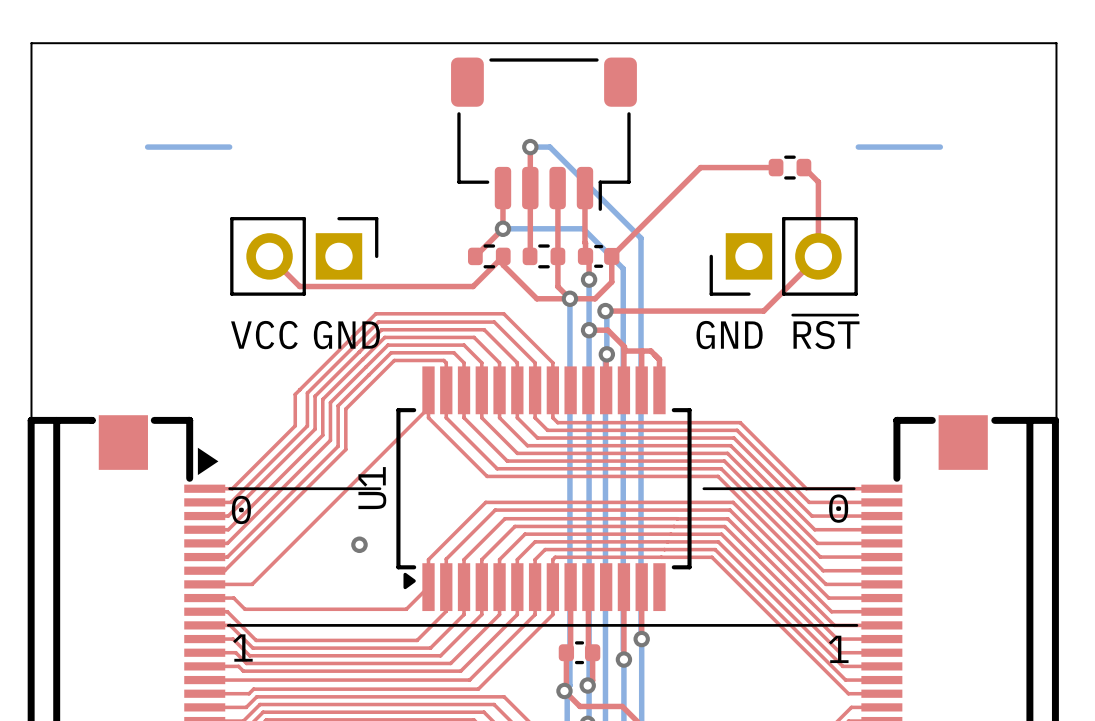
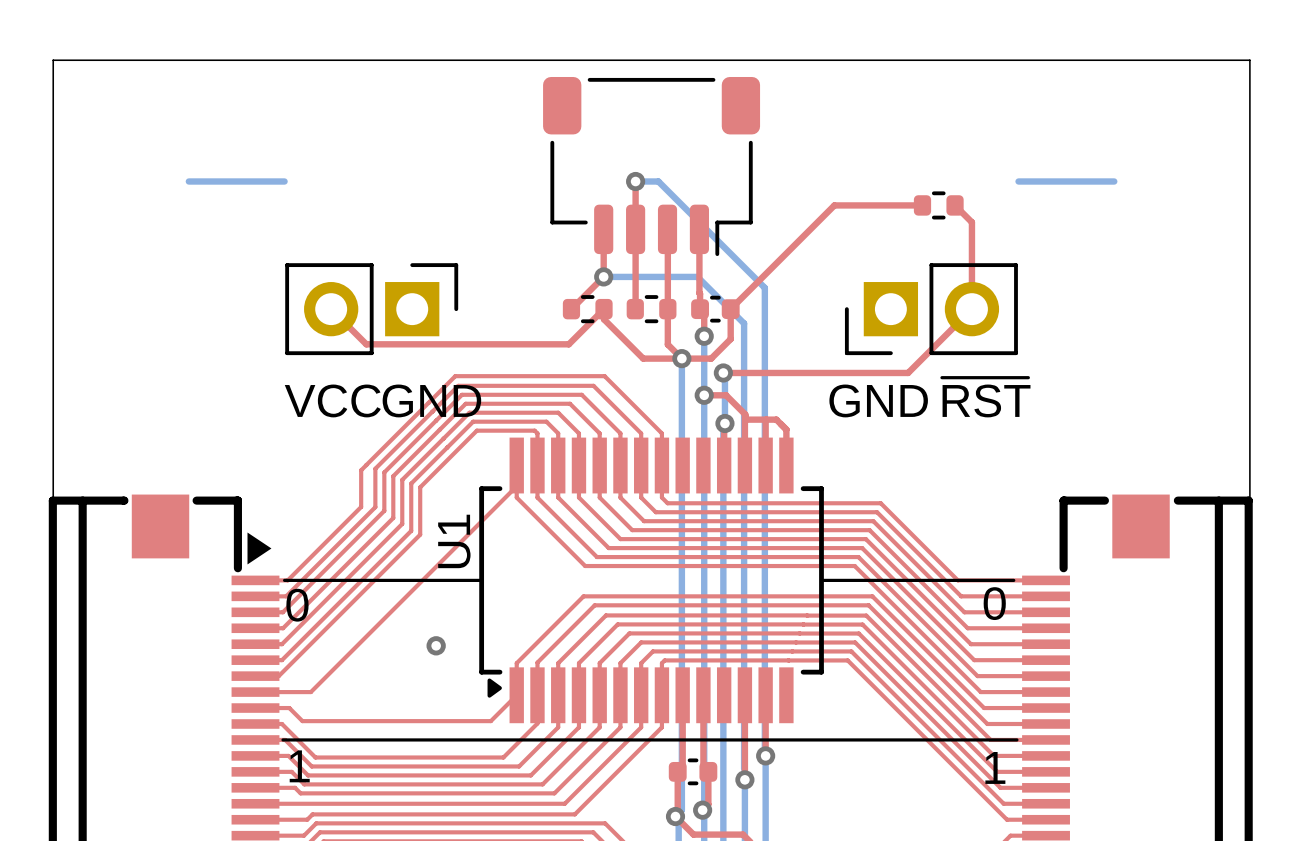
U1 name position: U1 (372, 488) -> U1 (454, 541)
line: none -> (460, 580) (481, 580)
line: none -> (821, 580) (838, 580)

